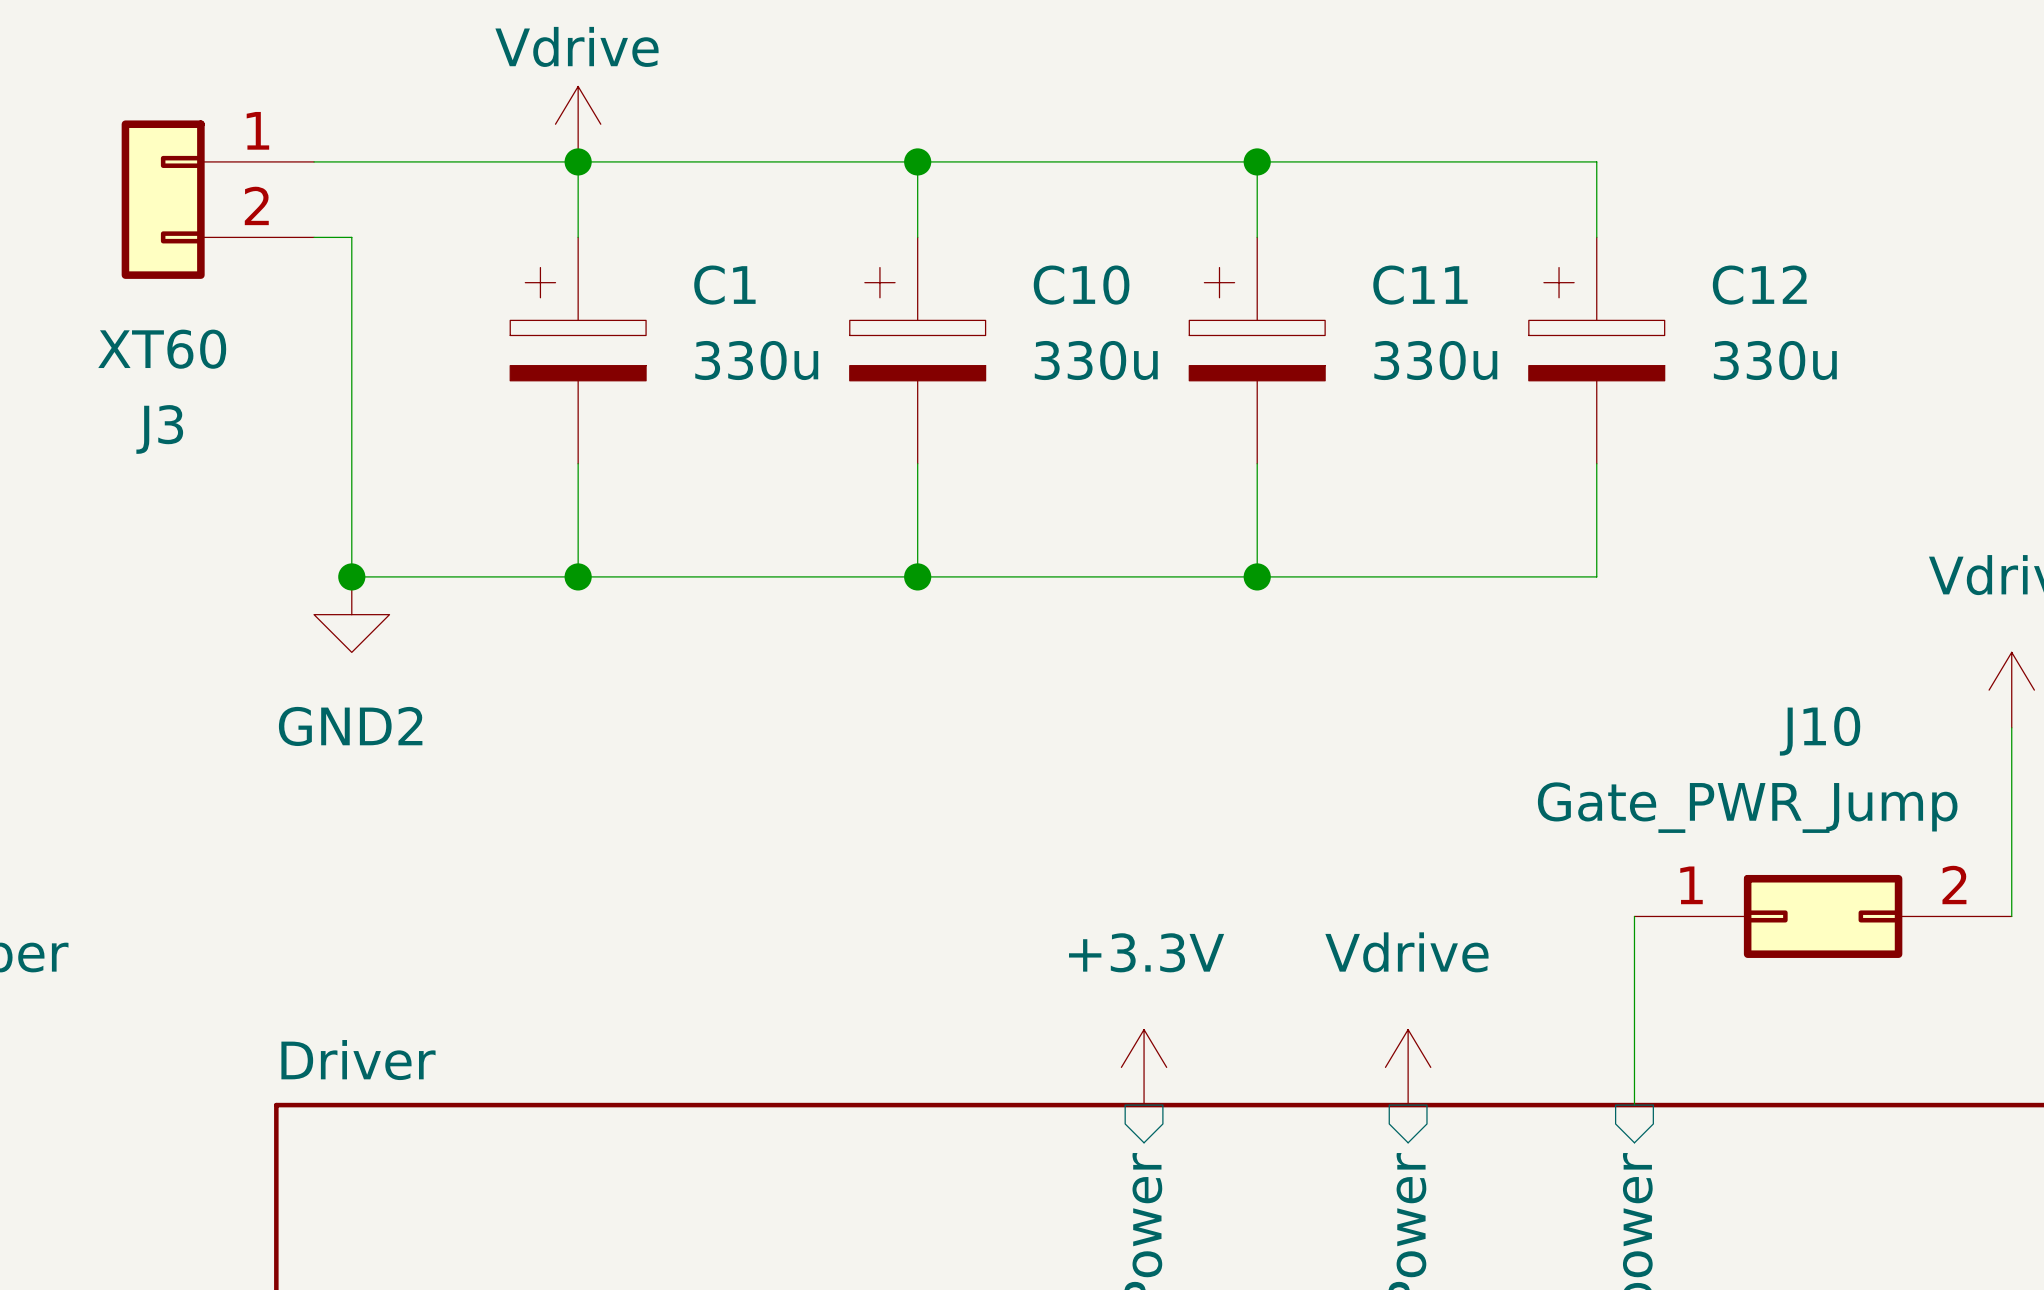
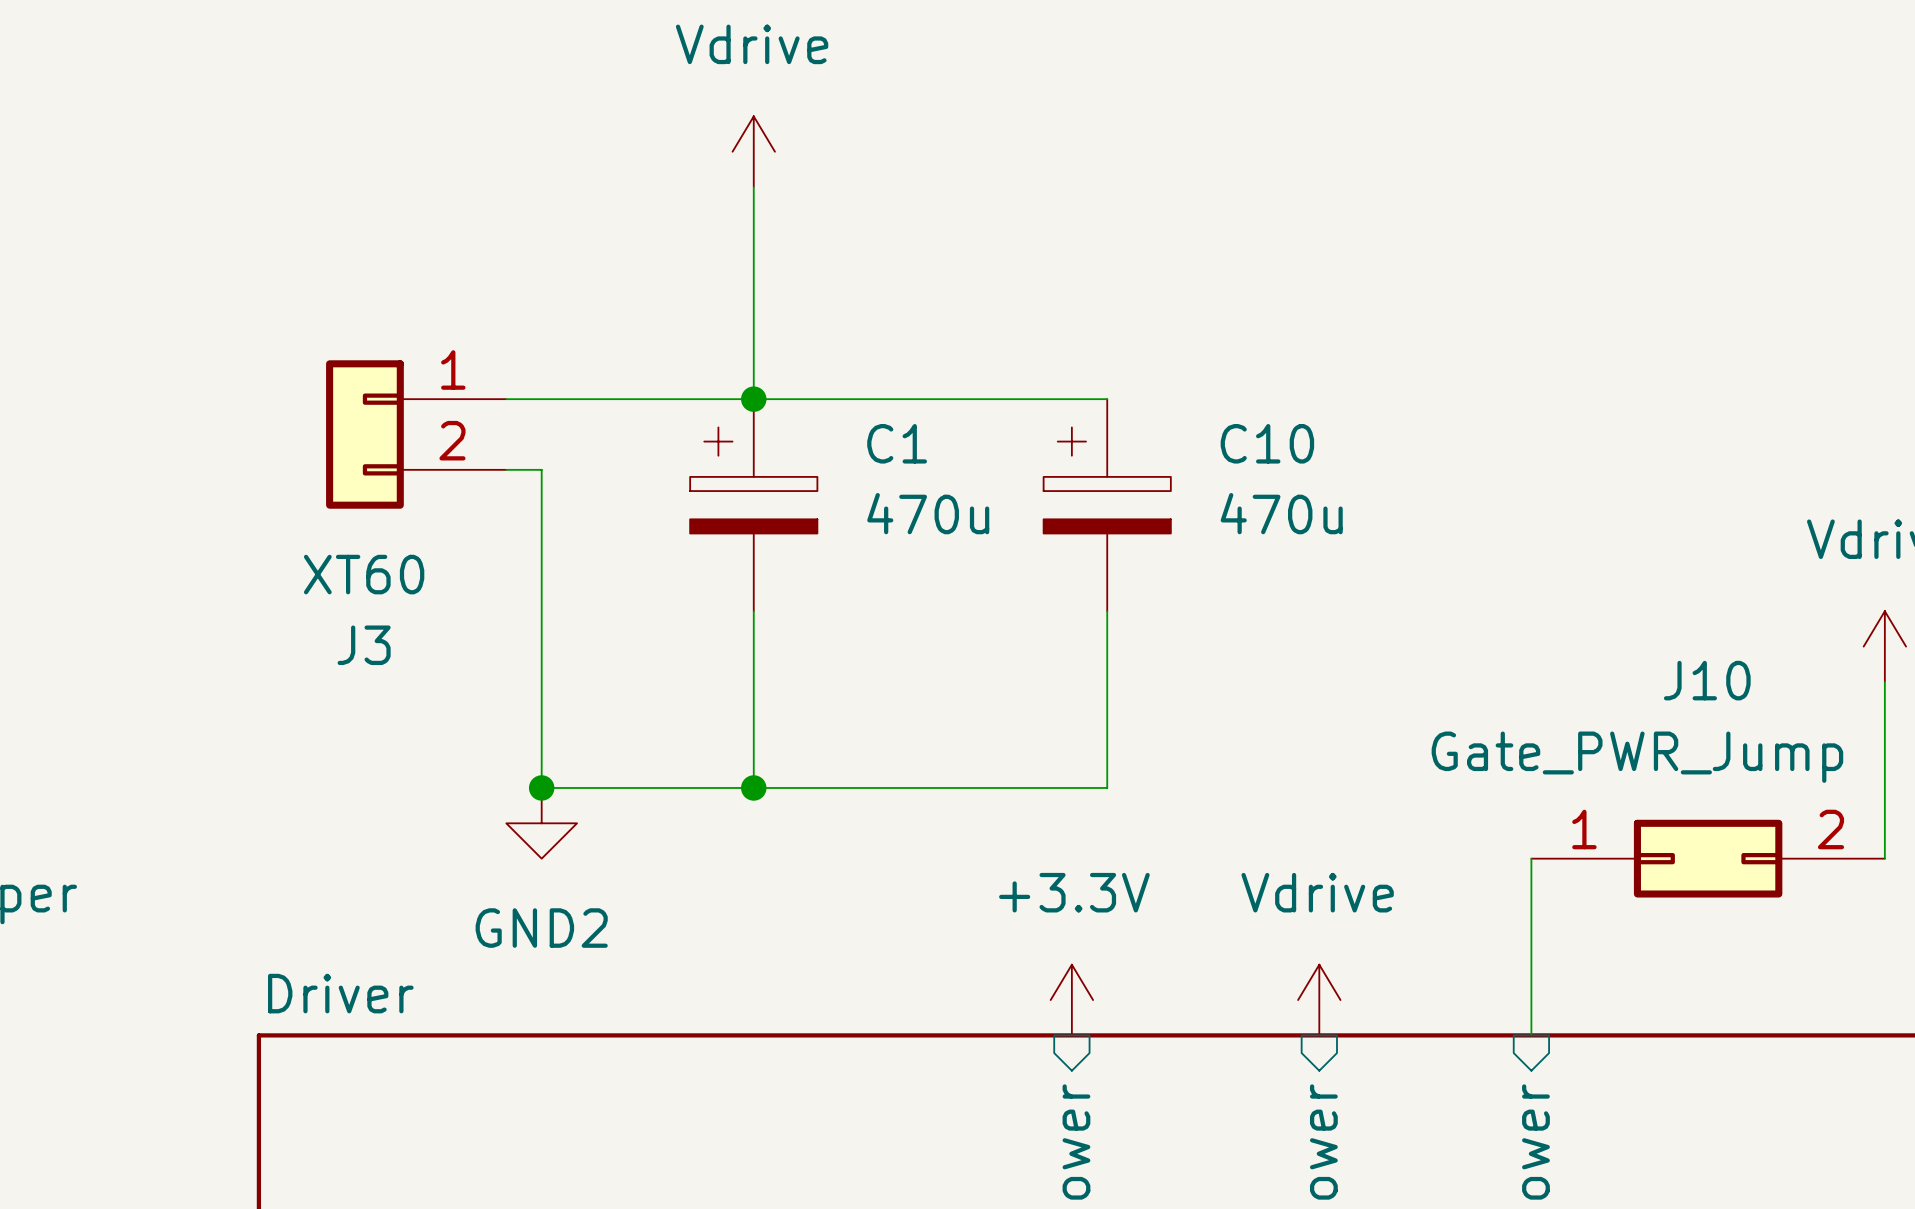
power symbol text position: Vdrive (576, 46) -> Vdrive (752, 44)
power symbol position: Vdrive (578, 124) -> Vdrive (753, 151)
wire: (314, 161) (1596, 161) (1596, 237) -> none
wire: (578, 161) (578, 237) -> none
junction: (578, 161) -> none
wire: (917, 161) (917, 237) -> none
junction: (917, 161) -> none
wire: (1257, 161) (1257, 237) -> none
junction: (1257, 161) -> none
J3 position: (217, 199) -> (416, 434)
wire: none -> (753, 187) (753, 399)
wire: (314, 237) (351, 237) (351, 576) (1596, 576) (1596, 463) -> none
C1 position: (578, 350) -> (753, 505)
C10 position: (917, 350) -> (1107, 505)
C11: 330u (1257, 350) -> none
C12: 330u (1596, 350) -> none
C1 value: 330u (756, 360) -> 470u (928, 513)
C10 value: 330u (1096, 360) -> 470u (1281, 513)
wire: none -> (506, 399) (1107, 399)
junction: none -> (753, 399)
wire: (578, 463) (578, 501) -> (506, 469) (541, 469)
wire: (917, 463) (917, 576) -> none
wire: (1257, 463) (1257, 576) -> none
junction: (351, 576) -> none
wire: none -> (541, 540) (541, 787) (1107, 787) (1107, 611)
junction: (578, 576) -> none
junction: (917, 576) -> none
junction: (1257, 576) -> none
power symbol position: GND2 (351, 614) -> GND2 (541, 823)
wire: none -> (753, 611) (753, 787)
junction: none -> (541, 787)
junction: none -> (753, 787)

